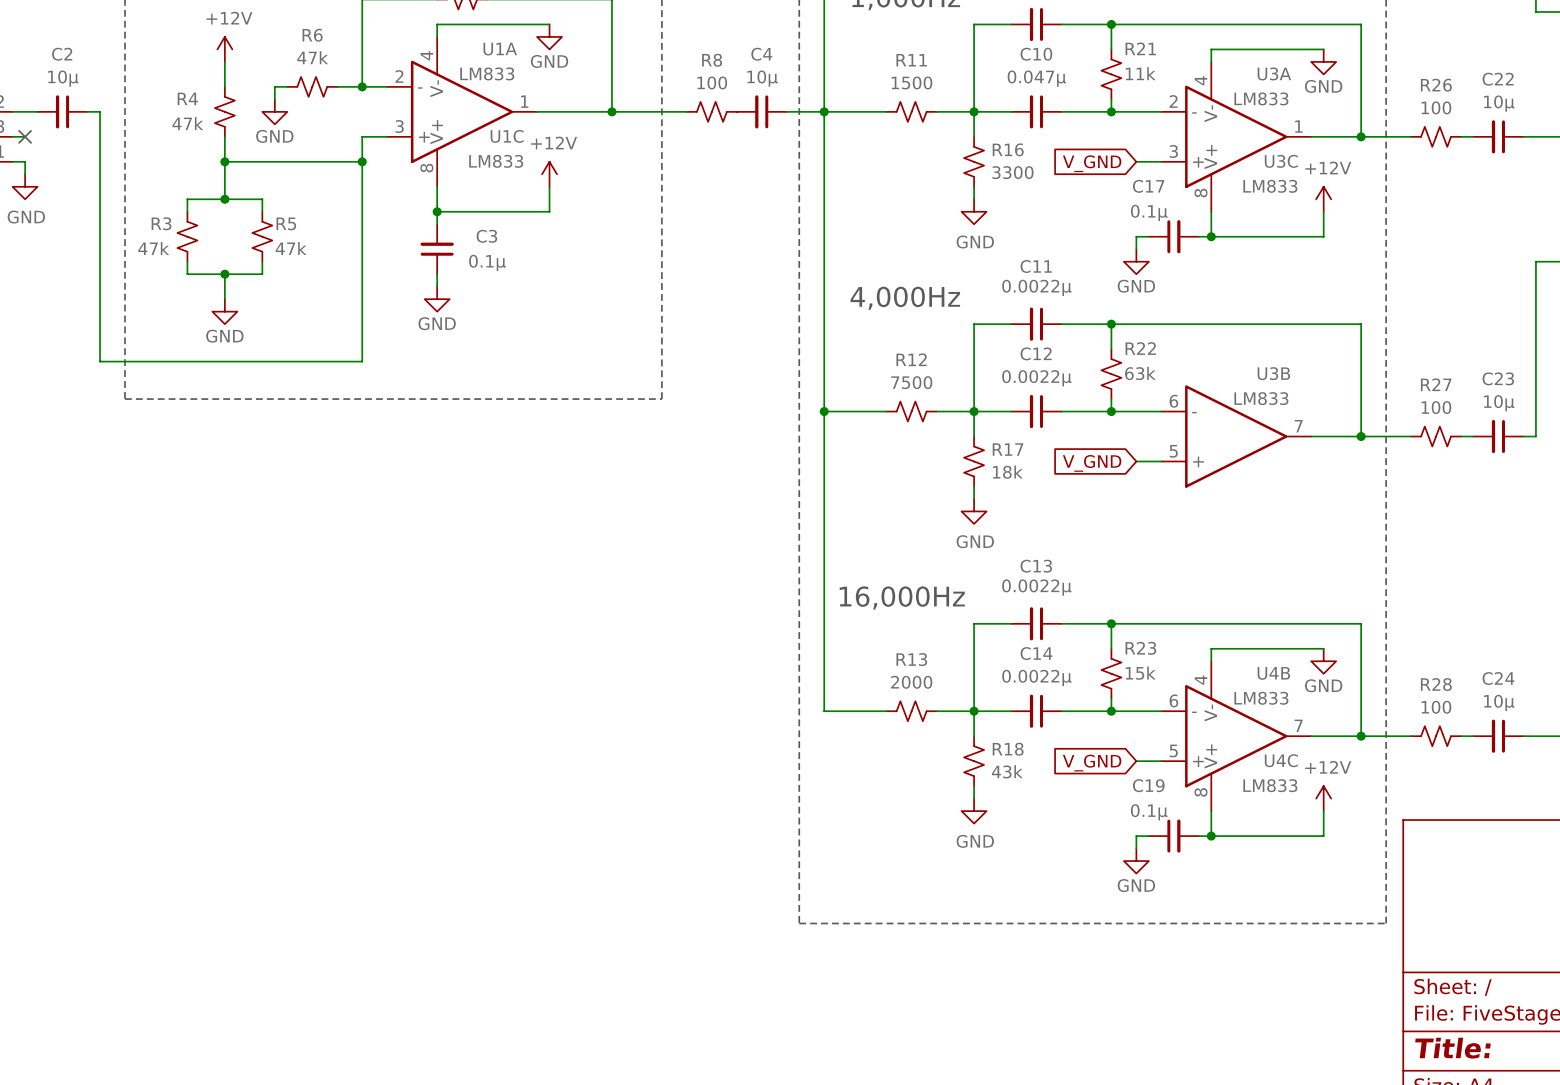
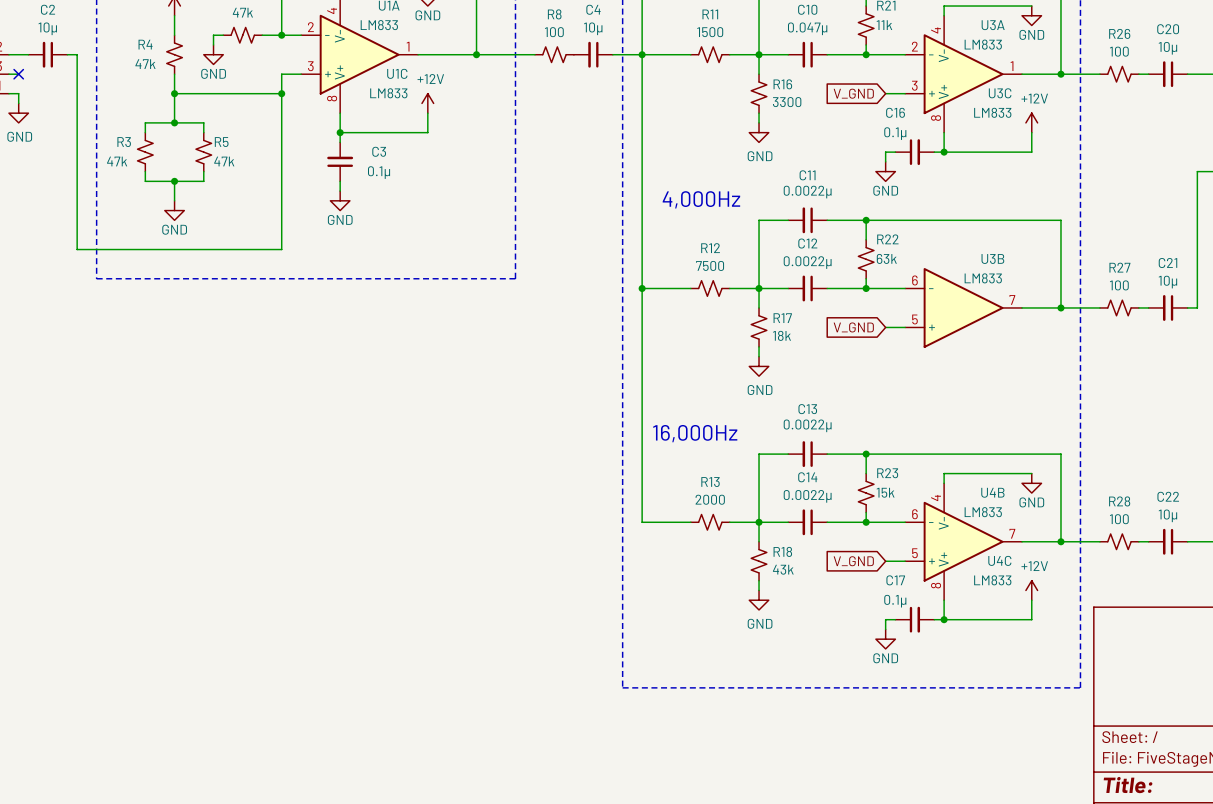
C22 name: C22 (1498, 79) -> C20 (1168, 29)
C17 name: C17 (1148, 186) -> C16 (895, 112)
C23 name: C23 (1498, 378) -> C21 (1167, 263)
C24 name: C24 (1498, 678) -> C22 (1168, 496)
C19 name: C19 (1148, 785) -> C17 (895, 580)

